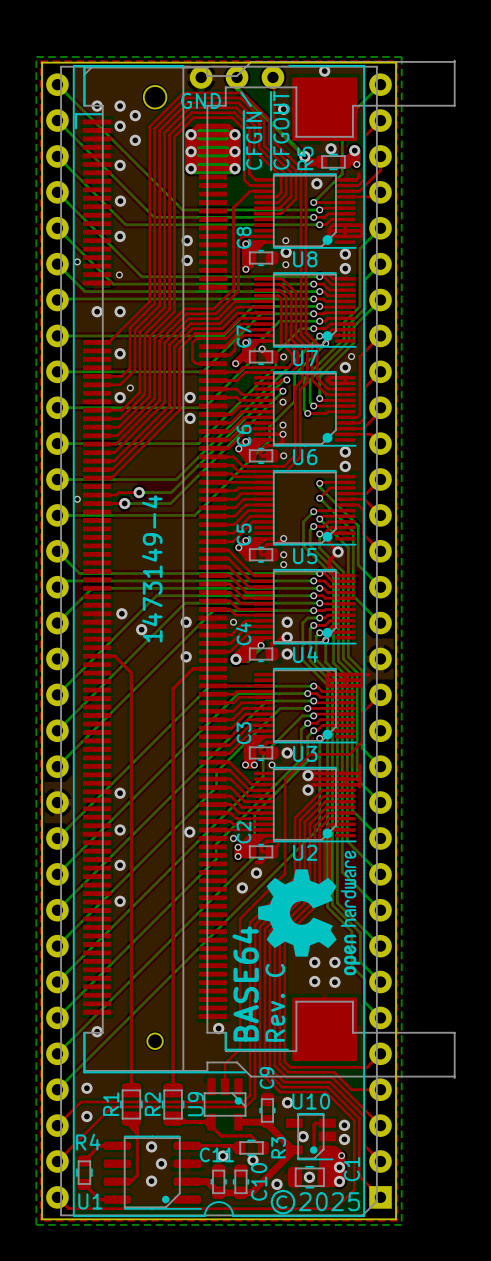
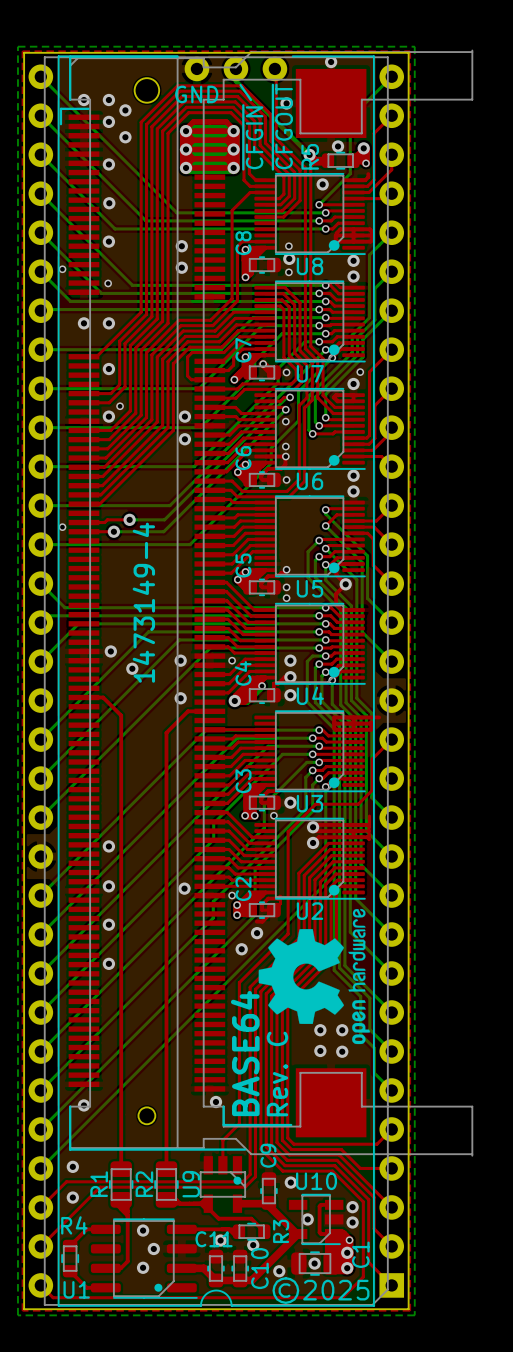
U10 footprint: [285, 1113, 336, 1161] -> [288, 1193, 344, 1246]

